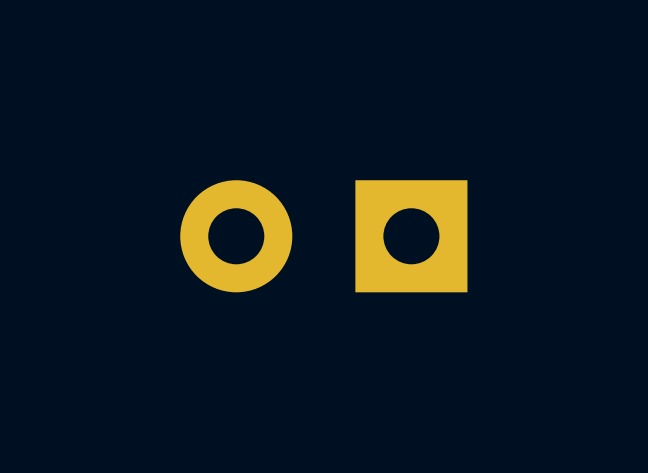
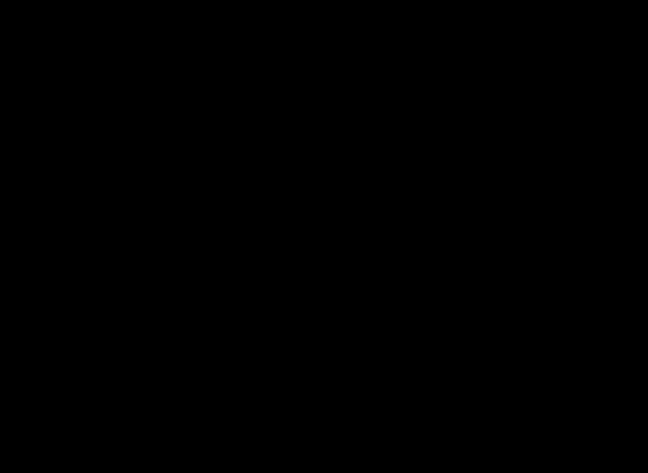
part: (323, 236) -> none

